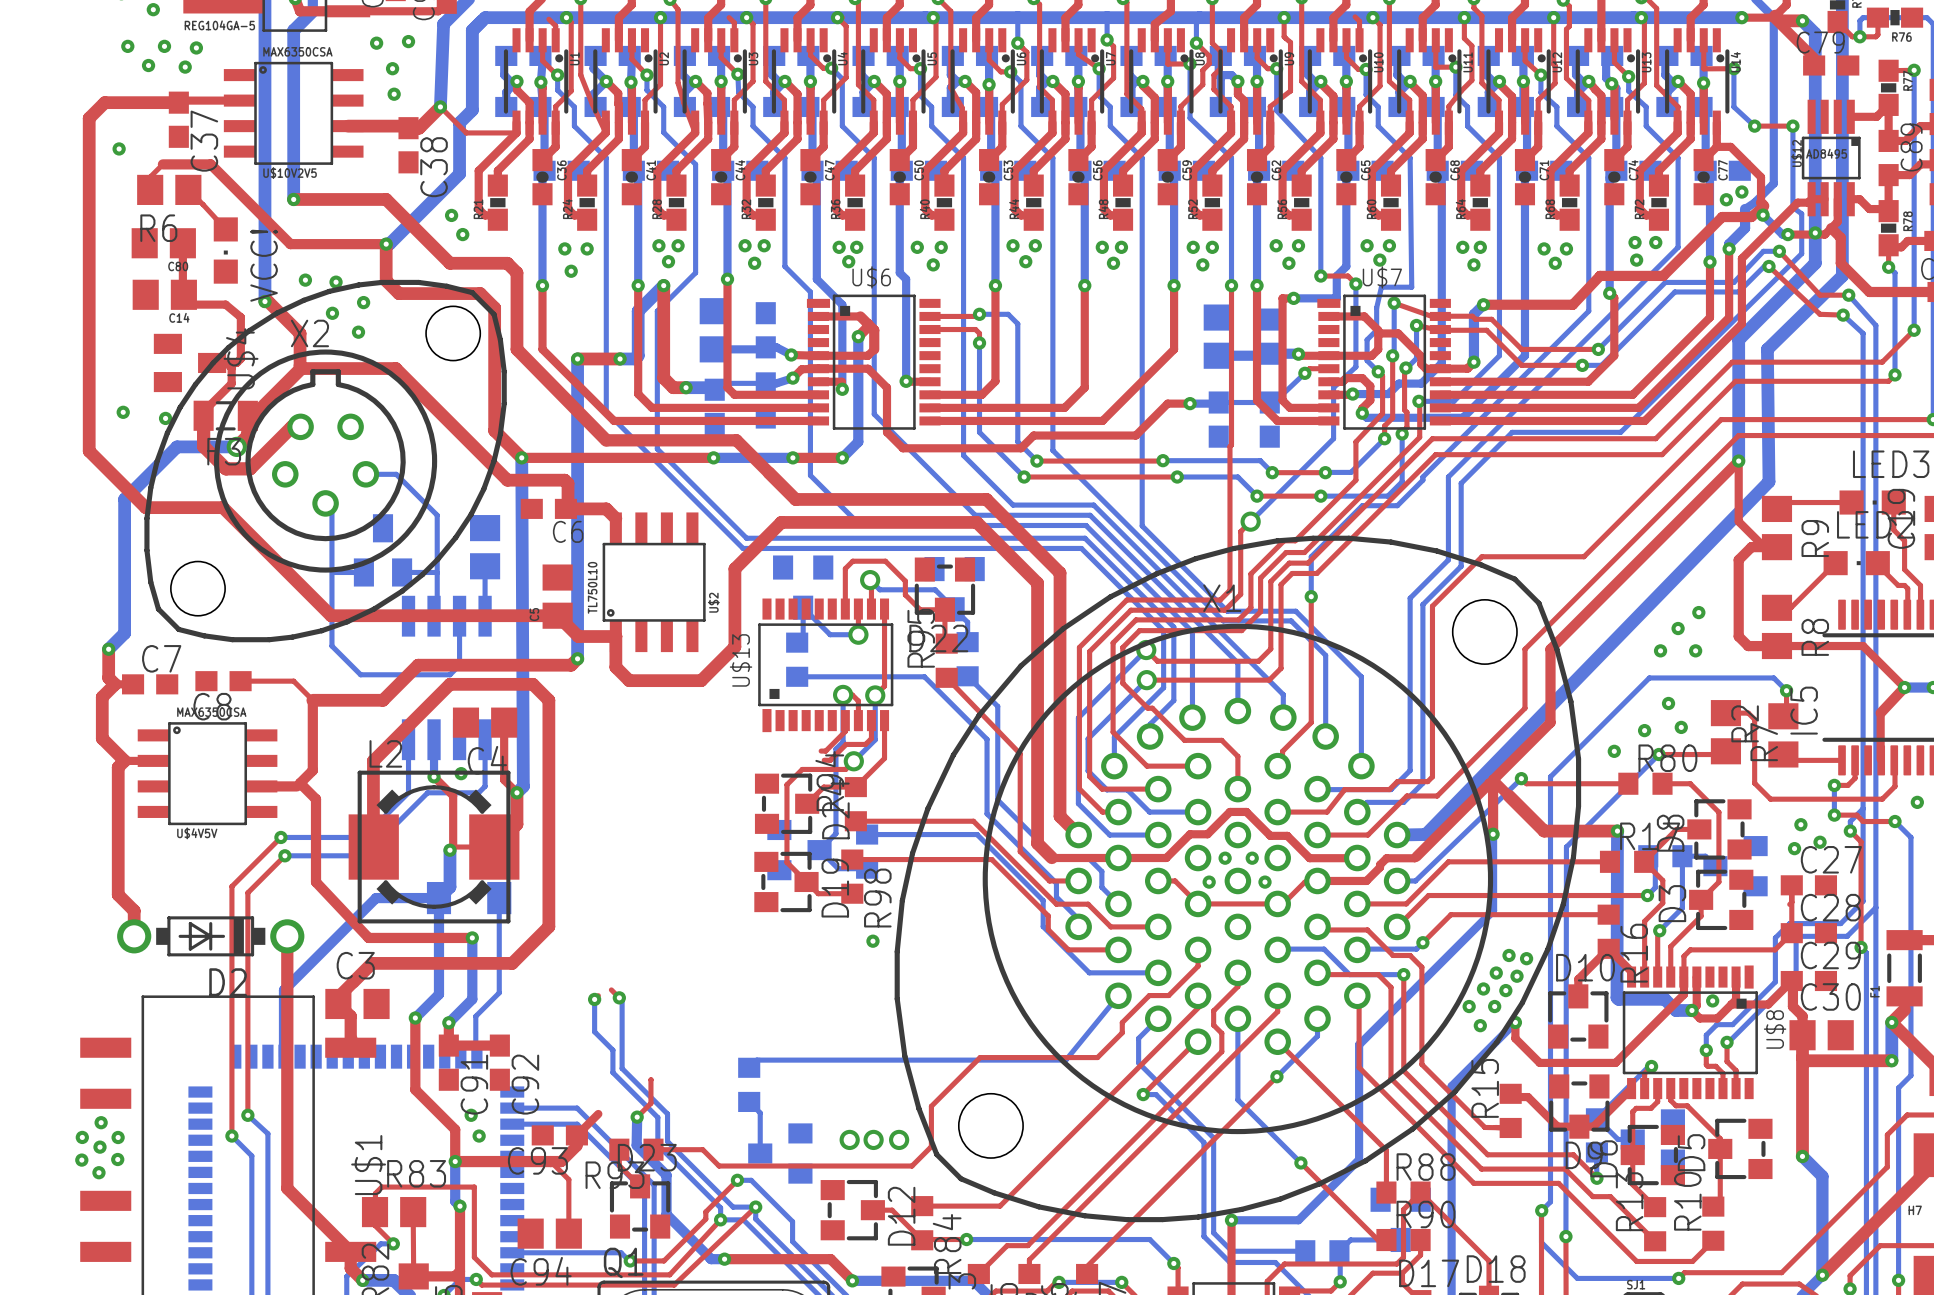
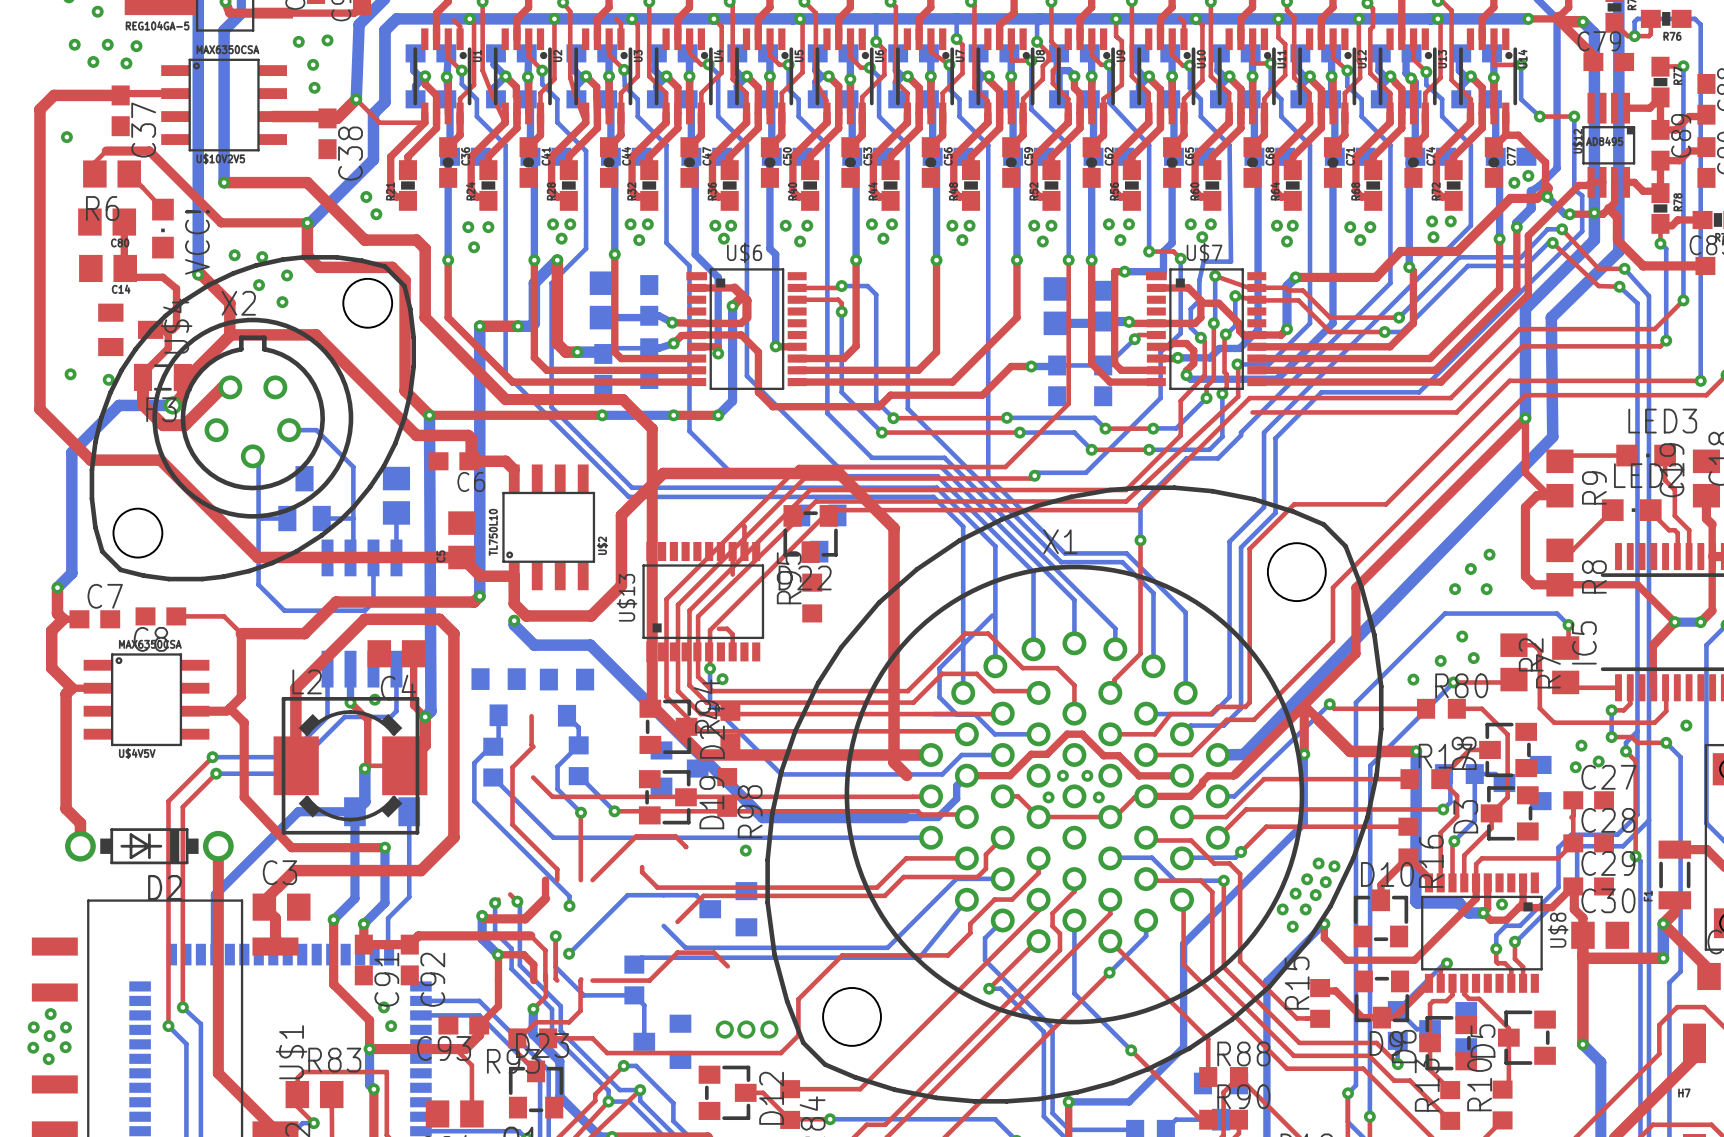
top track: (1419, 437) (1304, 552) (1286, 552) (1260, 578) (1260, 611) (1241, 630) (1139, 630) (1122, 647) (1122, 683) (1147, 708) (1152, 708) (1184, 740) (1221, 740) (1237, 757) -> (1238, 396) (1126, 501) (815, 501) (698, 616) (698, 676) (712, 691) (907, 691) (965, 633) (988, 633) (1022, 668) (1057, 668) (1074, 685)
top track: (1229, 446) (1229, 590) (1220, 600) (1126, 600) (1079, 647) (1079, 788) (1102, 812) (1118, 812) -> (1067, 405) (1005, 467) (798, 467) (666, 599) (666, 696) (700, 731) (963, 731) (966, 734)
top track: (1435, 454) (1316, 573) (1292, 573) (1281, 584) (1281, 668) (1269, 680) (1146, 680) -> none
top track: (769, 472) (795, 499) (986, 499) (1060, 572) (1060, 816) (1078, 835) -> (652, 705) (701, 754) (931, 754)
top track: none -> (652, 428) (652, 705)
top track: (1250, 521) (1240, 531) (1240, 594) (1224, 610) (1130, 610) (1089, 651) (1089, 776) (1102, 789) (1158, 789) -> (1034, 475) (1031, 478) (804, 478) (677, 604) (677, 691) (700, 714) (1002, 713)
bottom track: none -> (1085, 472) (1037, 472) (1034, 475)
via: (1250, 521) -> none
via: none -> (1034, 475)
top track: (1284, 540) (1250, 573) (1250, 607) (1238, 619) (1136, 619) (1113, 642) (1113, 732) (1147, 766) (1198, 766) -> (1116, 490) (810, 490) (689, 610) (689, 685) (706, 702) (913, 702) (942, 673) (976, 673) (994, 691) (1036, 691) (1038, 692)
top track: (1289, 563) (1270, 581) (1270, 649) (1258, 661) (1157, 661) (1146, 650) -> (1120, 510) (830, 510) (710, 630) (710, 668)
bottom track: (870, 580) (879, 589) (935, 589) (967, 622) (967, 642) -> none
via: (870, 580) -> none
bottom track: (1114, 581) (1163, 630) (1163, 687) (1114, 737) -> (963, 526) (963, 666)
part: (803, 587) -> none
bottom track: (1150, 603) (1173, 627) (1173, 700) (1150, 724) -> (995, 546) (995, 655)
top track: (845, 609) (845, 568) (852, 561) (885, 561) (905, 581) (905, 594) (920, 609) (944, 609) (944, 641) (946, 643) -> none
top track: (884, 609) (884, 686) (875, 695) -> none
bottom track: (858, 634) (830, 634) (803, 607) (803, 636) (797, 642) -> none
via: (858, 634) -> none
bottom track: (1146, 650) (1078, 717) (1078, 803) (1109, 835) (1112, 835) -> (710, 668) (710, 703) (781, 774) (942, 774) (961, 754)
via: (1146, 650) -> none
part: (797, 659) -> none
part: (967, 659) -> none
bottom track: (797, 676) (924, 676) (987, 739) (987, 813) (1056, 883) (1056, 897) (1078, 919) (1078, 926) -> (493, 777) (553, 837) (931, 837)
bottom track: (967, 676) (997, 706) (997, 800) (1054, 857) (1087, 857) (1101, 871) (1101, 887) (1118, 903) -> none
top track: (946, 677) (1020, 753) (1020, 851) (1049, 880) (1078, 880) -> none
via: (1146, 680) -> none
bottom track: none -> (514, 620) (514, 625) (534, 645) (590, 645) (762, 817) (937, 817) (956, 798) (956, 785) (966, 775)
via: none -> (514, 620)
bottom track: (843, 694) (843, 741) (835, 749) (835, 833) (819, 850) (838, 868) (867, 868) -> none
via: (843, 694) -> none
bottom track: (875, 695) (875, 739) (853, 761) -> none
via: (875, 695) -> none
top track: (845, 720) (845, 731) (825, 751) (821, 751) -> none
top track: (871, 720) (871, 738) (865, 744) (846, 744) (830, 760) (824, 760) -> none
top track: (884, 720) (884, 758) (855, 787) (823, 787) (807, 803) -> none
via: none -> (710, 668)
via size: [843, 751, 864, 772] -> [716, 673, 729, 686]
top track: (853, 761) (845, 769) (802, 769) (786, 784) (786, 862) (818, 893) (852, 893) -> none
part: none -> (498, 697)
part: none -> (566, 697)
bottom track: none -> (498, 715) (498, 741) (474, 763) (474, 801) (569, 896) (569, 905)
top track: none -> (531, 716) (531, 745) (533, 746) (512, 767) (512, 824) (557, 869) (557, 880)
bottom track: none -> (566, 715) (578, 727) (578, 745) (557, 766) (557, 789) (581, 812)
top track: (855, 821) (973, 821) (1056, 904) (1088, 904) (1110, 926) (1158, 926) -> (677, 921) (703, 895) (884, 895) (903, 877) (977, 877) (985, 868) (985, 854) (1002, 837)
bottom track: (867, 834) (977, 834) (1043, 900) (1043, 926) (1089, 972) (1158, 972) -> (663, 925) (685, 947) (887, 947) (956, 878) (1002, 878)
part: none -> (578, 760)
part: none -> (493, 762)
part: (867, 851) -> none
bottom track: none -> (578, 776) (614, 811)
top track: (1052, 858) (1118, 858) -> none
top track: (852, 859) (991, 859) (1048, 915) (1048, 929) (1068, 949) -> (642, 867) (642, 872) (657, 887) (877, 887) (906, 858) (921, 858)
top track: none -> (533, 777) (552, 796) (931, 796) (929, 794)
top track: none -> (614, 811) (917, 811) (921, 814) (964, 814) (966, 817)
via: none -> (614, 811)
top track: none -> (580, 812) (580, 880)
via: none -> (581, 812)
top track: none -> (686, 846) (675, 836) (636, 836) (592, 880)
top track: none -> (545, 880) (545, 898) (525, 918) (485, 918) (482, 915)
via: none -> (569, 905)
bottom track: none -> (710, 909) (696, 895) (627, 895) (569, 953)
part: none -> (728, 909)
bottom track: none -> (482, 915) (482, 938) (497, 954)
via: none -> (482, 915)
top track: none -> (555, 936) (555, 979) (557, 980)
bottom track: none -> (555, 936) (555, 967) (583, 995) (634, 995)
via: none -> (555, 936)
top track: none -> (409, 944) (418, 935) (530, 935) (545, 950) (545, 980)
via: none -> (569, 953)
via: none -> (497, 954)
top track: none -> (727, 966) (714, 952) (677, 952) (649, 980) (592, 980)
top track: none -> (581, 979) (580, 1010) (569, 1022) (535, 1022) (519, 1038) (517, 1038)
top track: none -> (533, 980) (533, 964) (523, 954) (497, 954) (498, 1006)

